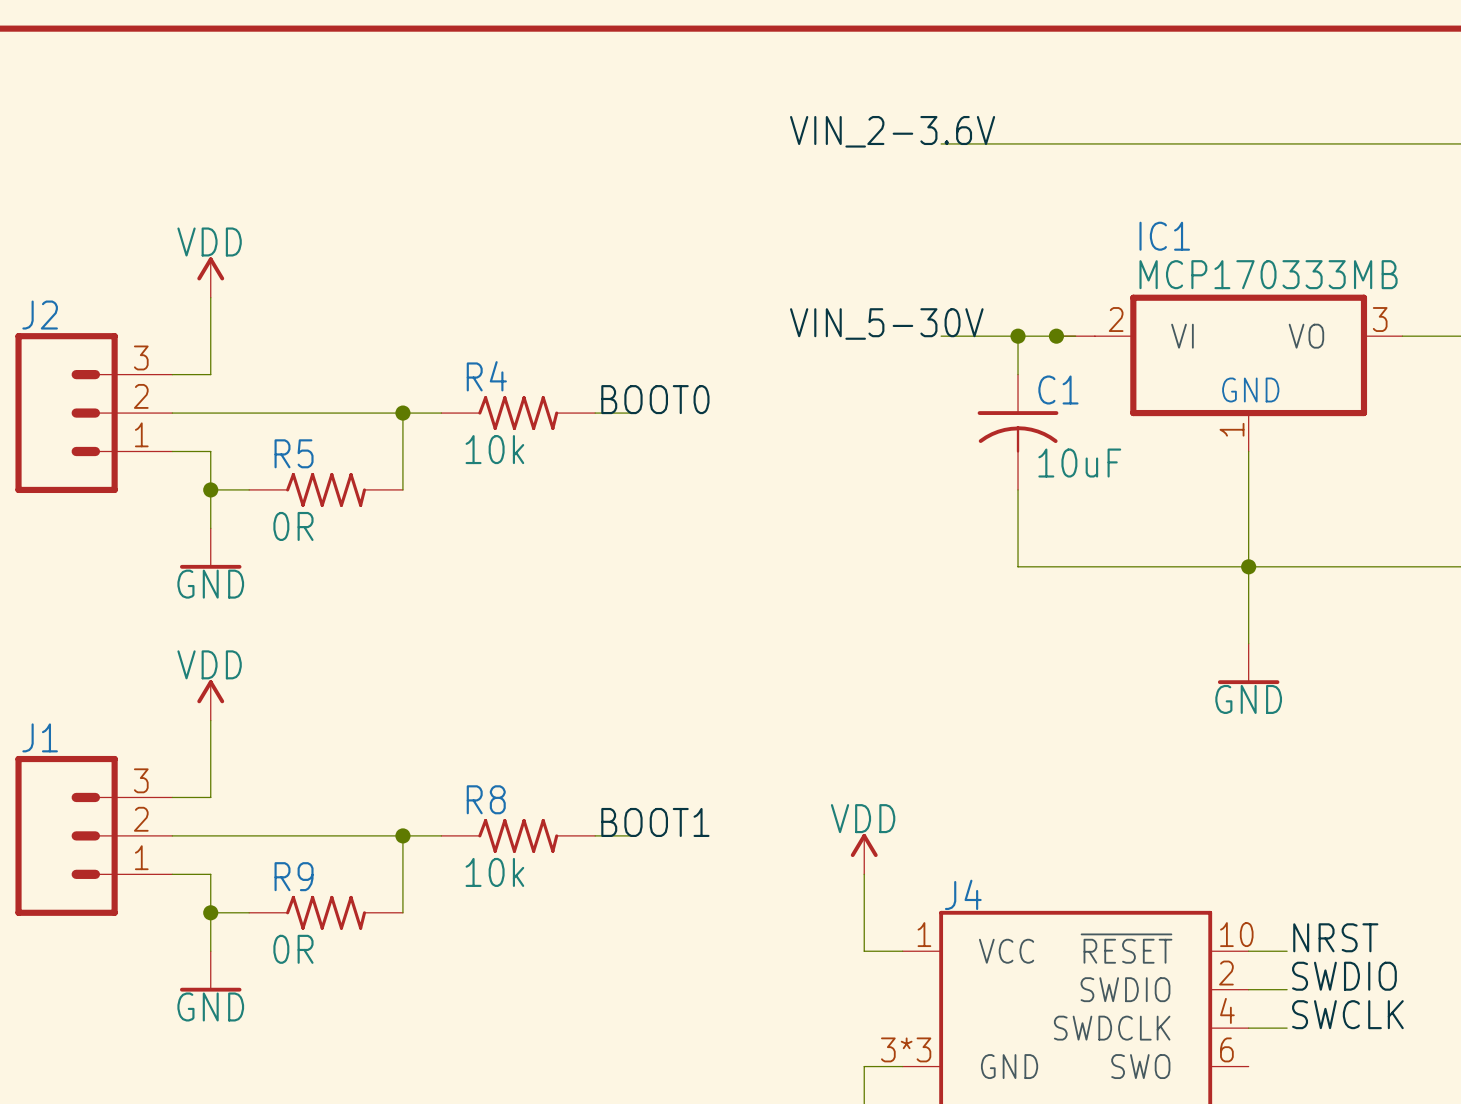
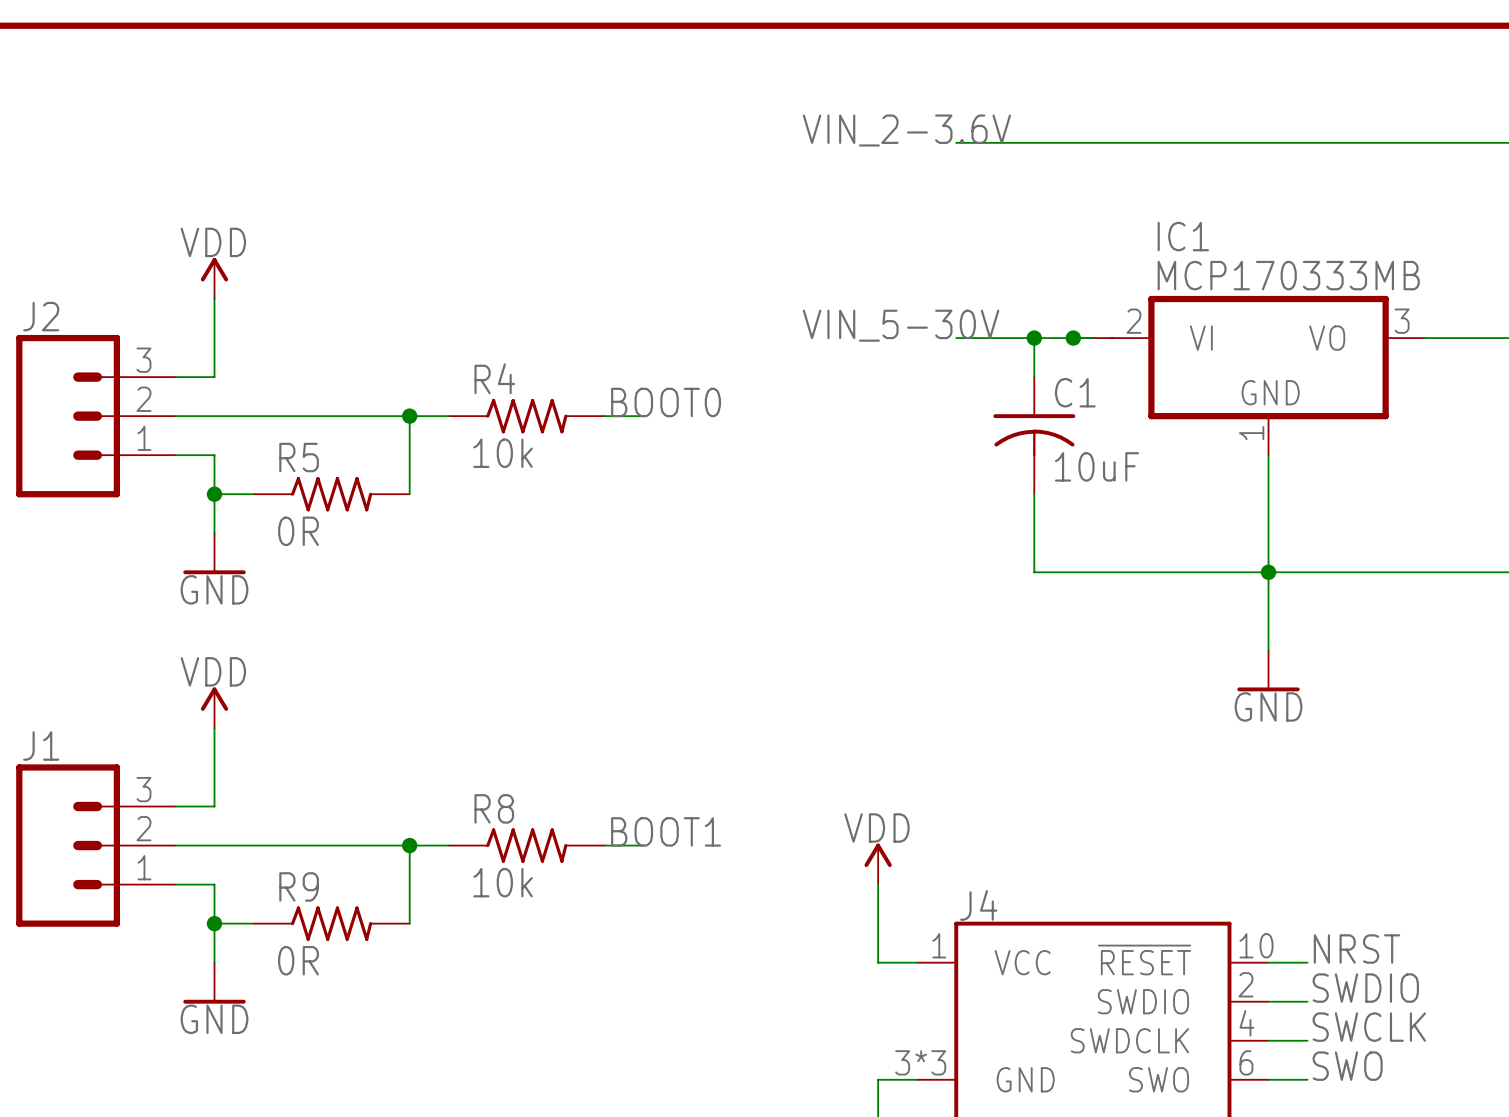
label: none -> SWO (1347, 1066)
wire: none -> (1268, 1079) (1307, 1079)

